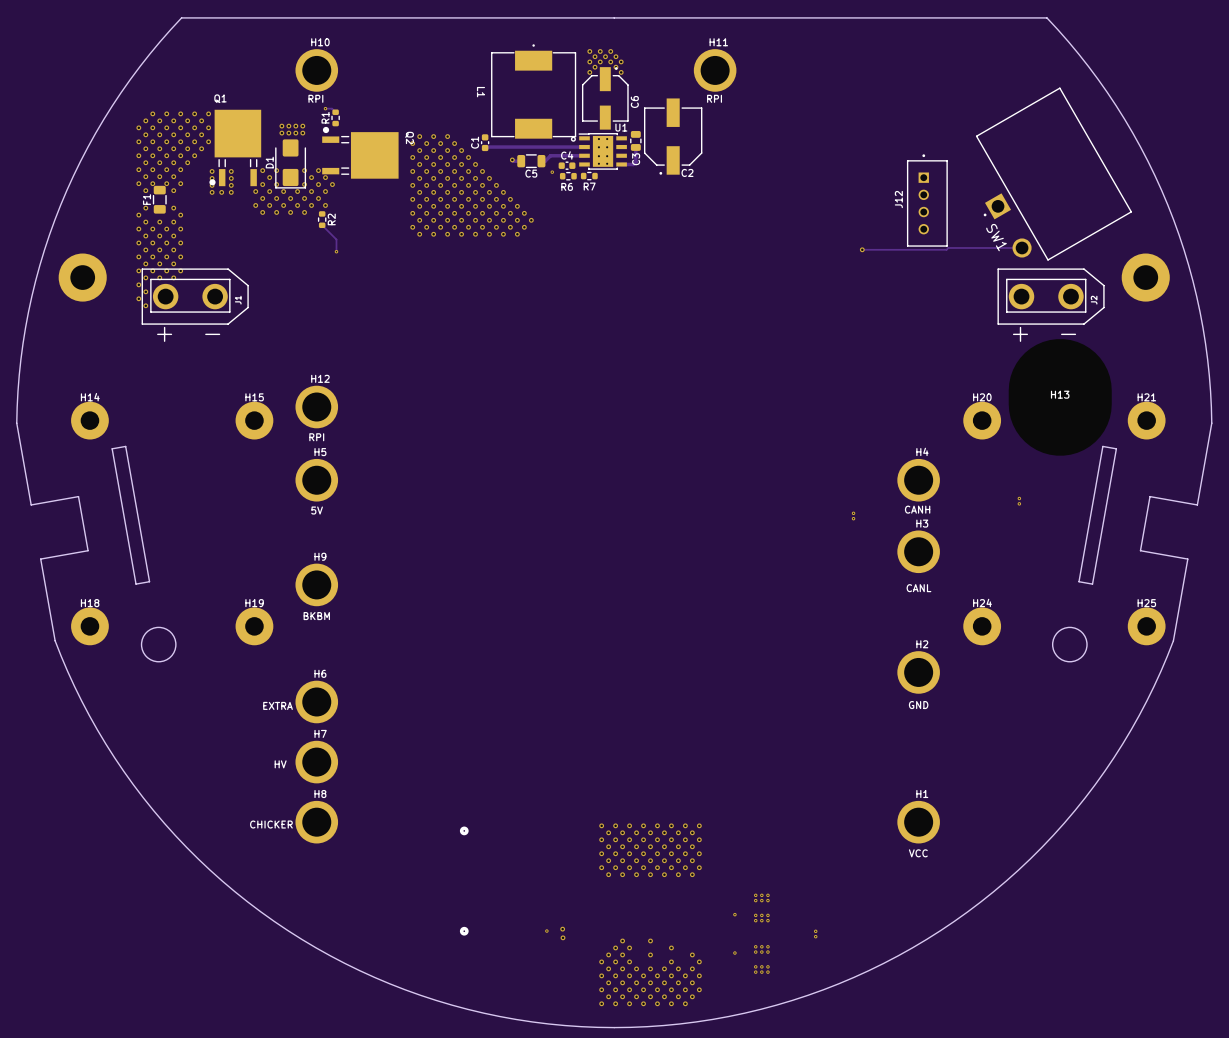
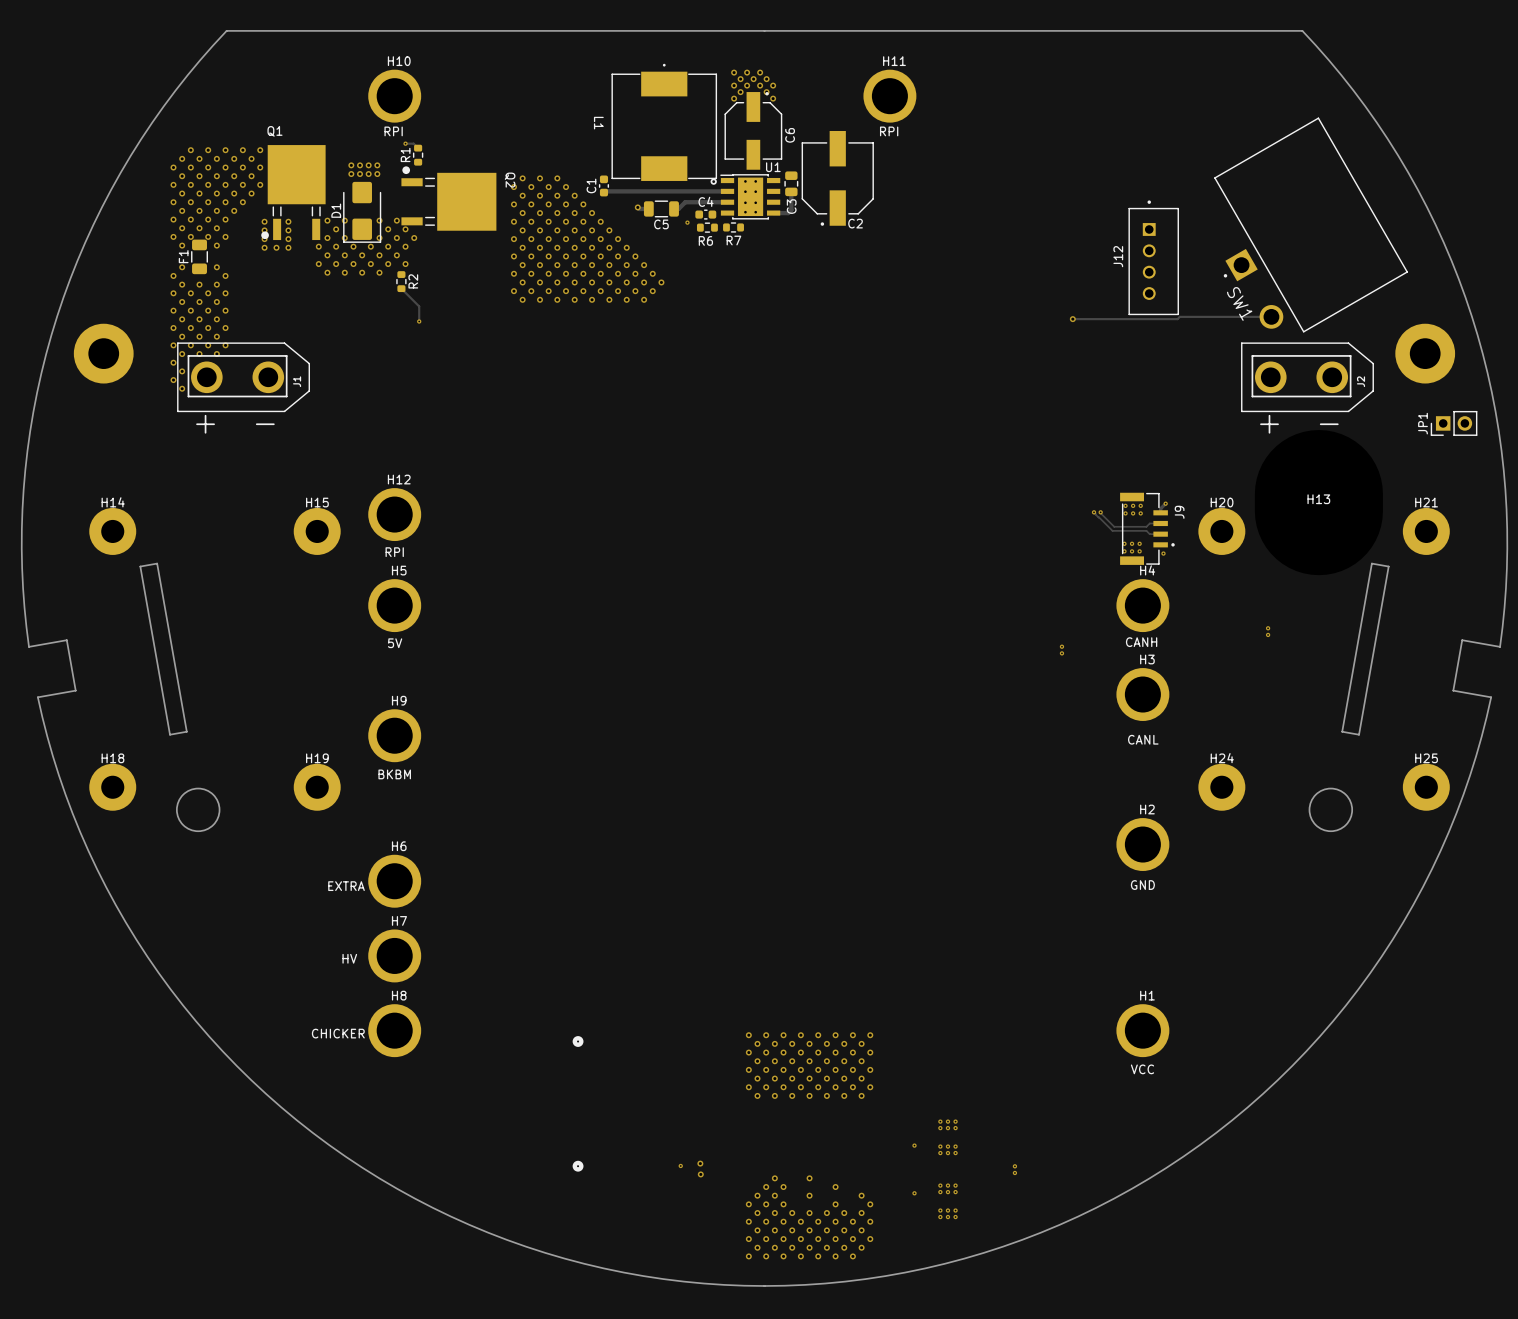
board edge: (181, 17) (130, 79) (103, 119) (80, 161) (49, 234) (35, 280) (25, 327) (19, 375) (16, 423) (31, 504) (78, 496) (88, 550) (40, 559) (55, 640) (67, 671) (105, 743) (133, 784) (164, 823) (222, 881) (287, 930) (330, 955) (374, 977) (451, 1005) (532, 1021) (614, 1027) (696, 1021) (776, 1005) (823, 989) (868, 970) (940, 930) (1006, 881) (1064, 823) (1095, 784) (1122, 743) (1160, 671) (1173, 640) (1187, 559) (1140, 550) (1150, 496) (1197, 504) (1211, 423) (1209, 375) (1202, 327) (1192, 280) (1179, 234) (1147, 161) (1124, 119) (1098, 79) (1046, 17) -> (226, 30) (200, 60) (163, 106) (130, 155) (102, 207) (85, 242) (63, 297) (46, 354) (33, 411) (27, 450) (22, 509) (22, 568) (26, 627) (28, 646) (66, 640) (75, 690) (37, 697) (52, 756) (80, 832) (106, 887) (125, 922) (158, 973) (196, 1021) (222, 1051) (266, 1094) (312, 1132) (362, 1167) (397, 1188) (450, 1216) (506, 1239) (564, 1258) (623, 1272) (663, 1279) (724, 1284) (764, 1285) (825, 1283) (885, 1276) (944, 1263) (983, 1252) (1040, 1232) (1078, 1216) (1131, 1188) (1183, 1156) (1232, 1120) (1277, 1080) (1306, 1051) (1345, 1005) (1370, 973) (1403, 922) (1422, 887) (1448, 832) (1470, 775) (1491, 697) (1453, 690) (1462, 640) (1500, 646) (1502, 627) (1506, 568) (1506, 509) (1501, 450) (1495, 411) (1482, 354) (1465, 297) (1443, 242) (1426, 207) (1408, 172) (1376, 122) (1341, 75) (1302, 30)
JP1: none -> (1454, 423)
track: none -> (1165, 503) (1160, 508) (1160, 512)
via: none -> (1165, 503)
via: none -> (1125, 505)
via: none -> (1133, 505)
via: none -> (1140, 505)
track: none -> (1094, 512) (1112, 530) (1146, 530) (1149, 534) (1160, 534)
via: none -> (1094, 512)
track: none -> (1100, 512) (1114, 526) (1146, 526) (1149, 523) (1160, 523)
via: none -> (1100, 512)
via: none -> (1125, 513)
via: none -> (1133, 513)
via: none -> (1140, 513)
J9: none -> (1147, 528)
via: none -> (1124, 543)
via: none -> (1132, 543)
via: none -> (1139, 543)
via: none -> (1124, 551)
via: none -> (1132, 551)
via: none -> (1139, 551)
via: none -> (1163, 553)

